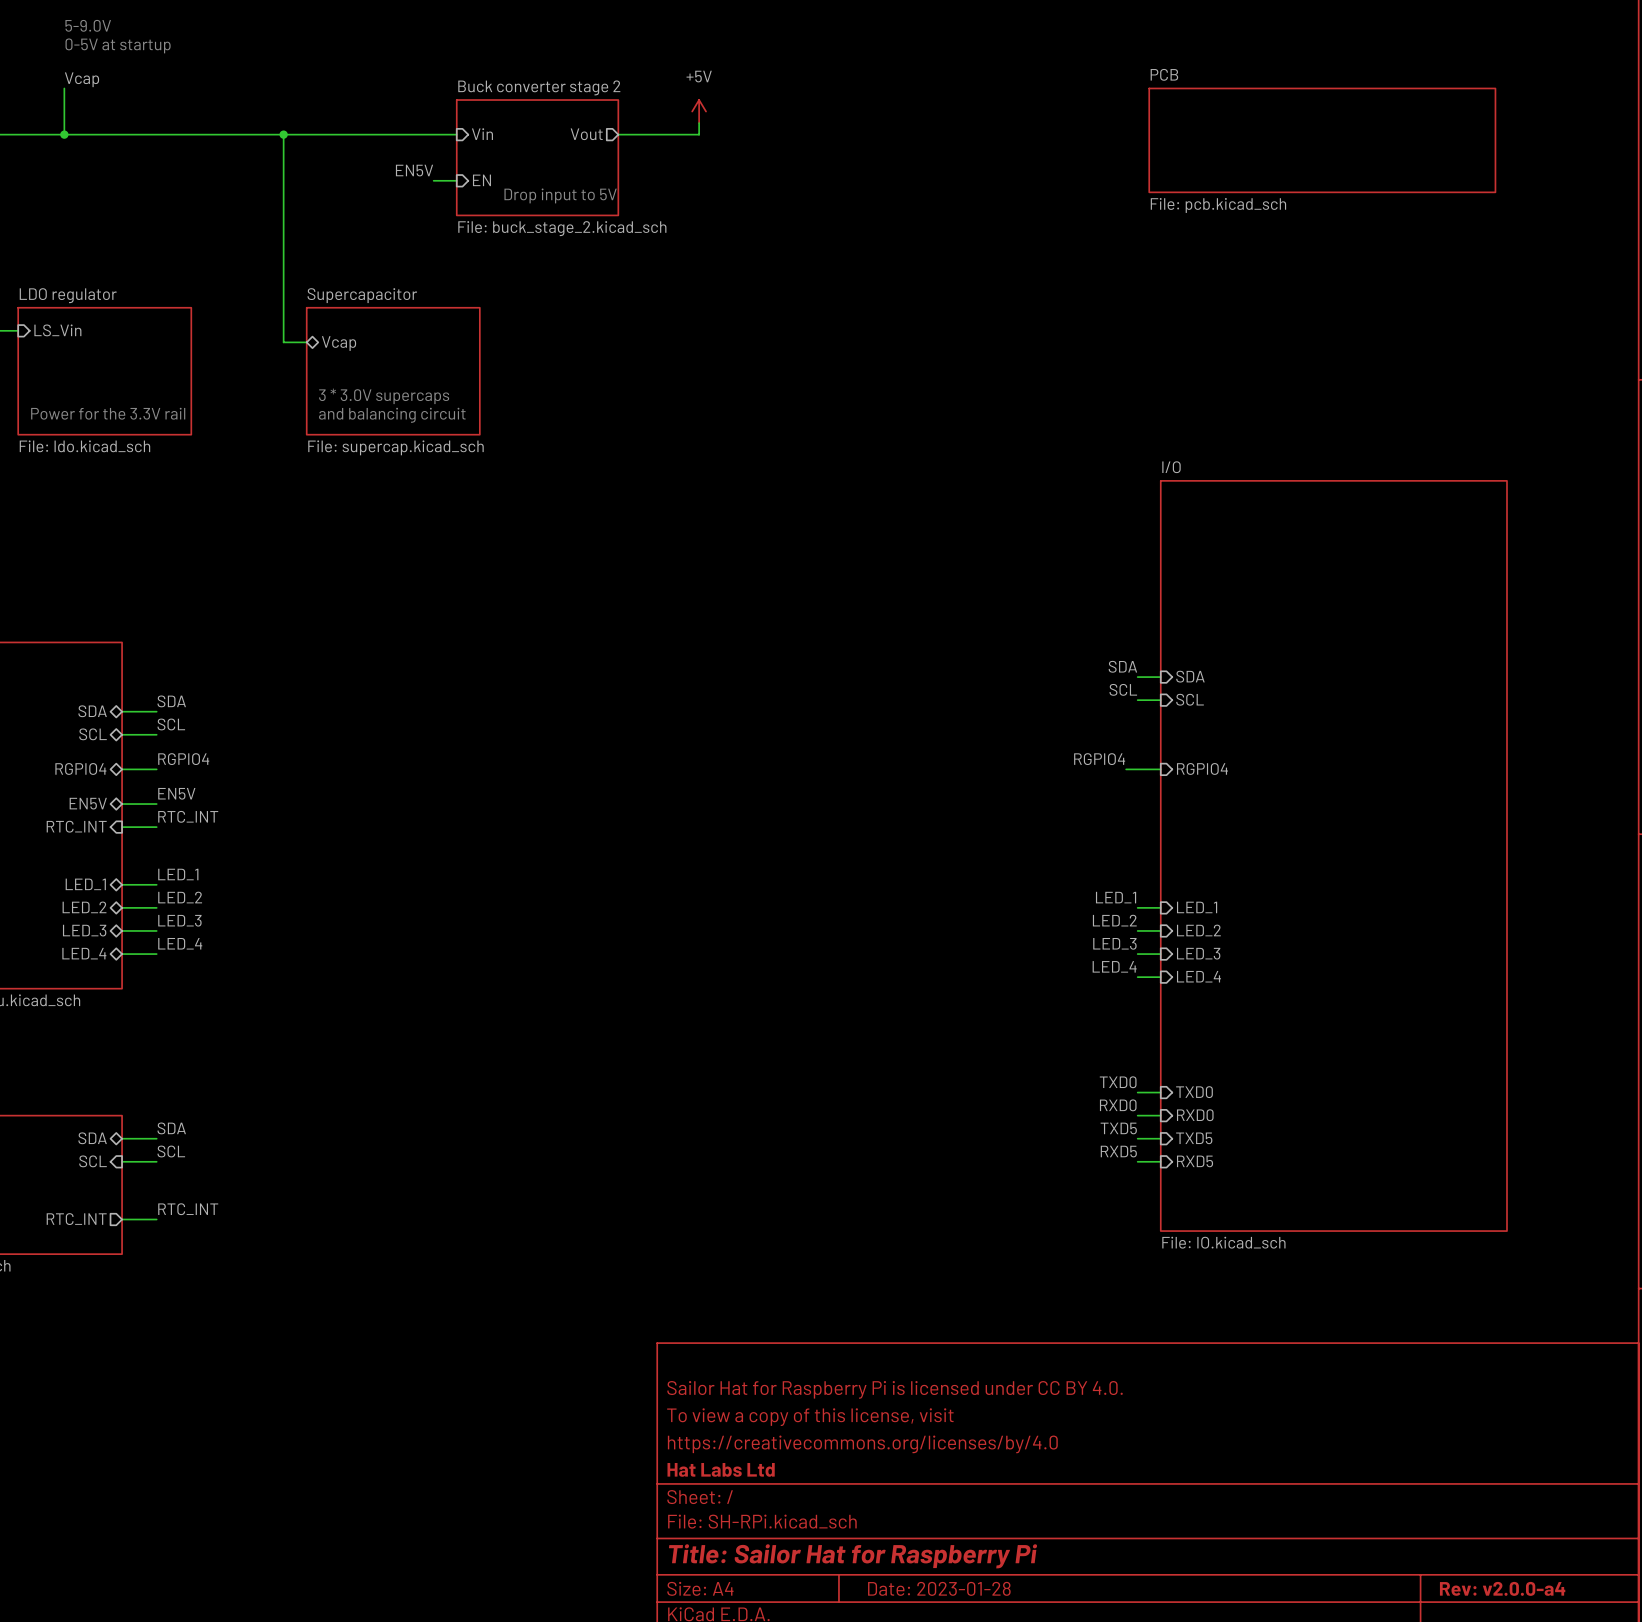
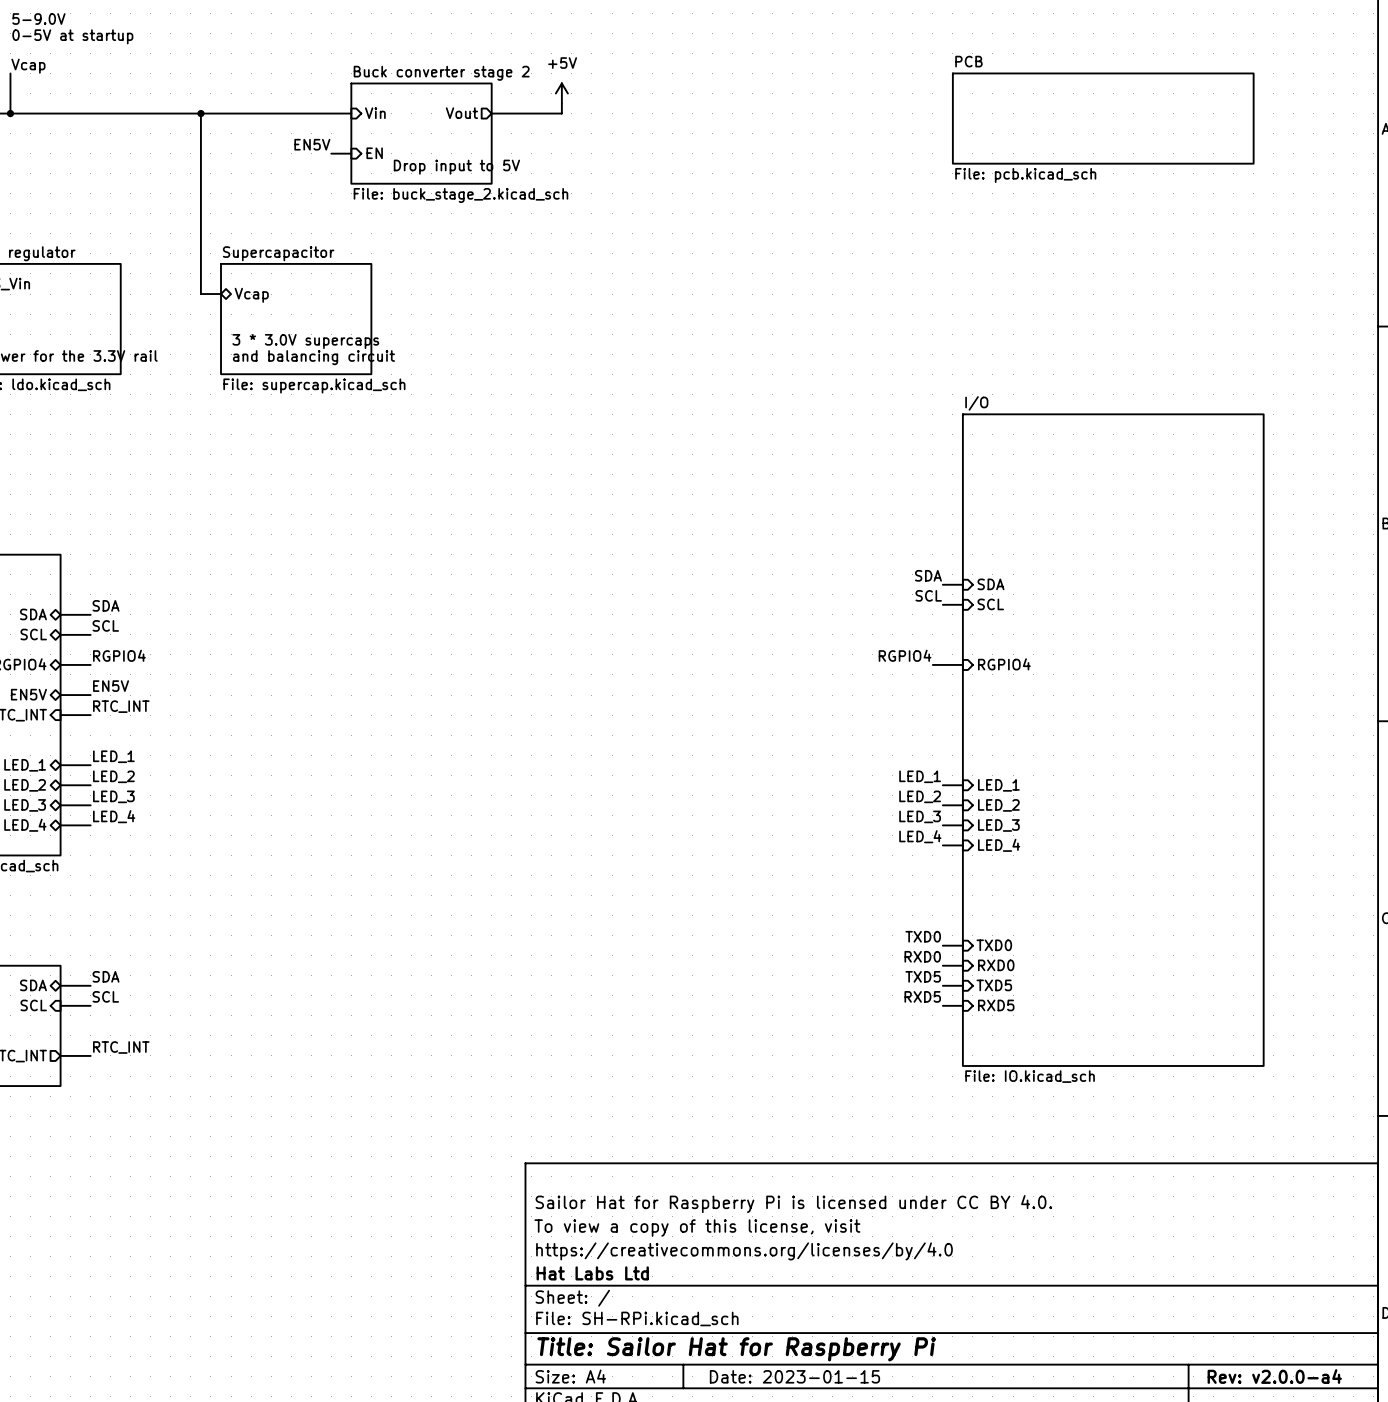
title block: Date: 2023-01-28 (939, 1588) -> Date: 2023-01-15 (794, 1376)

